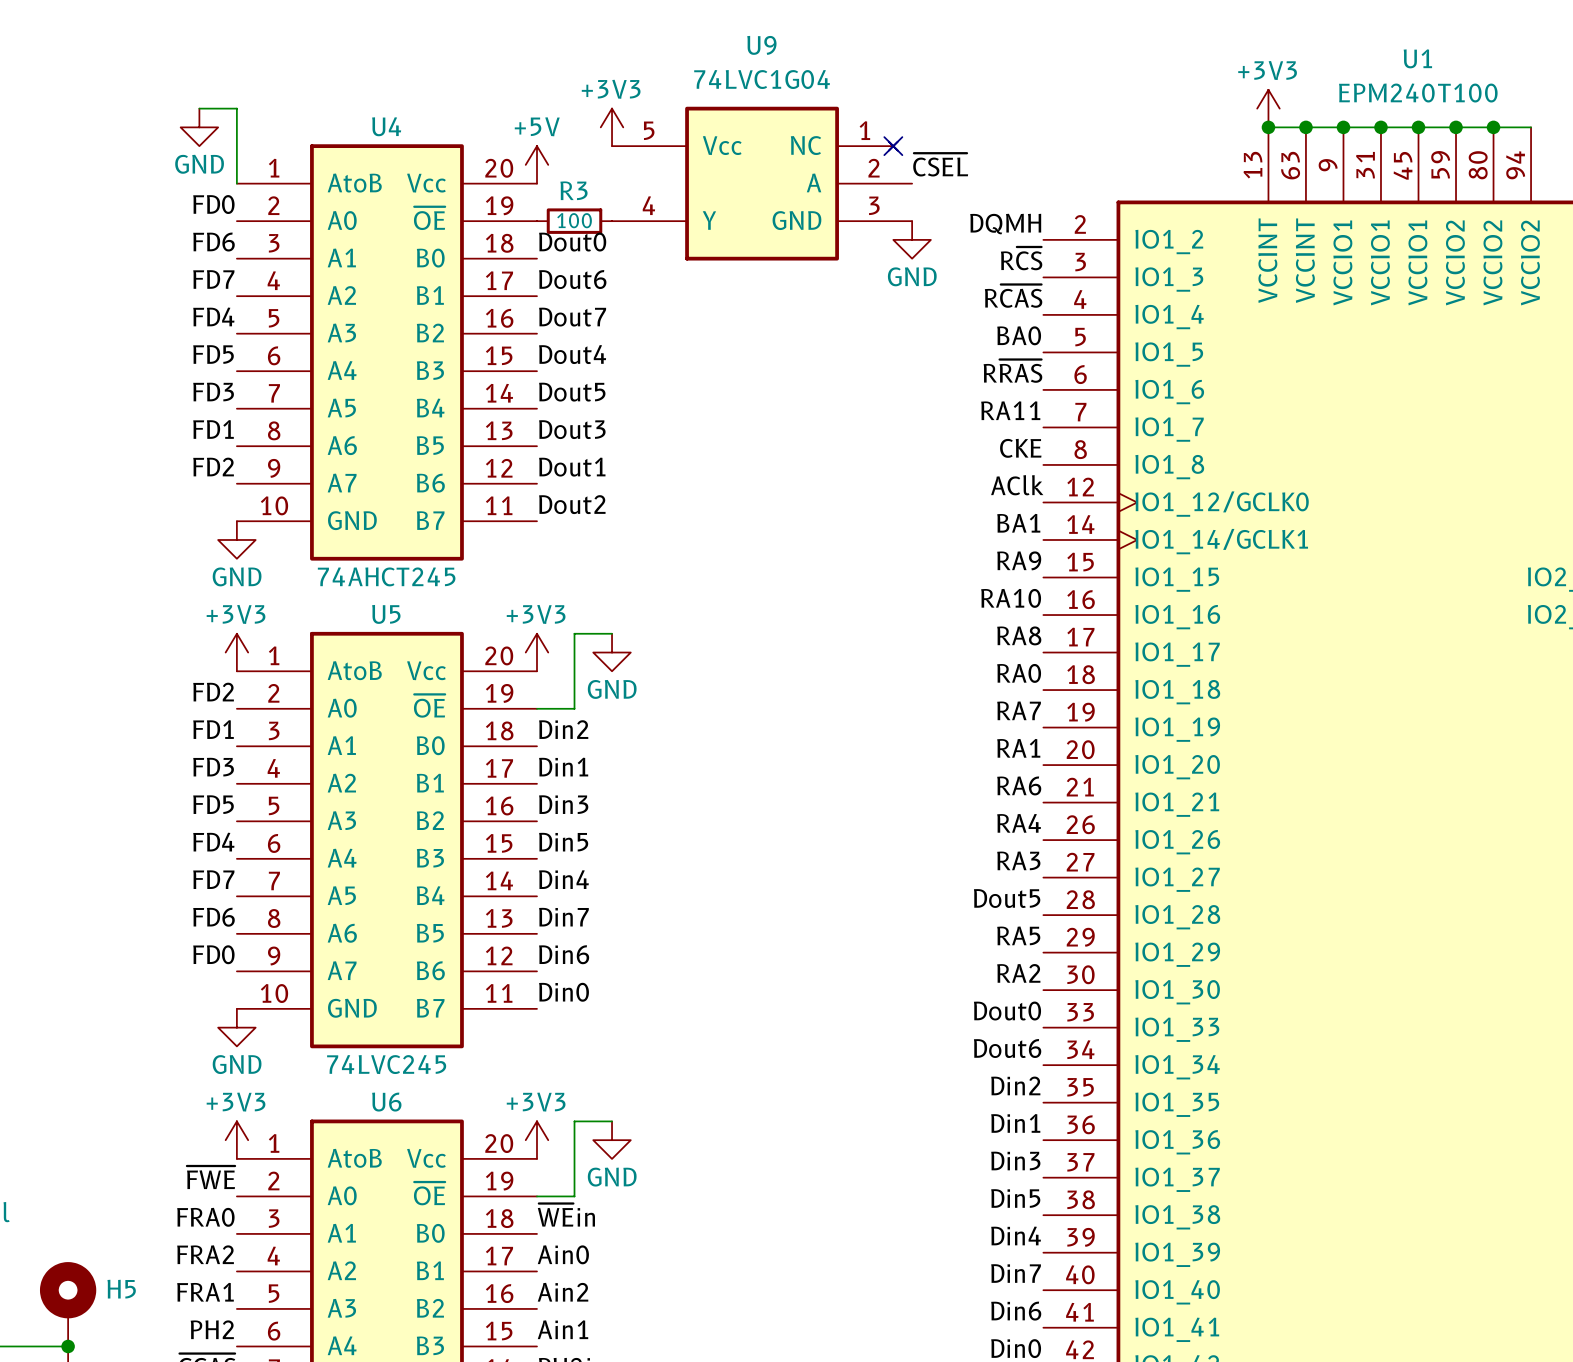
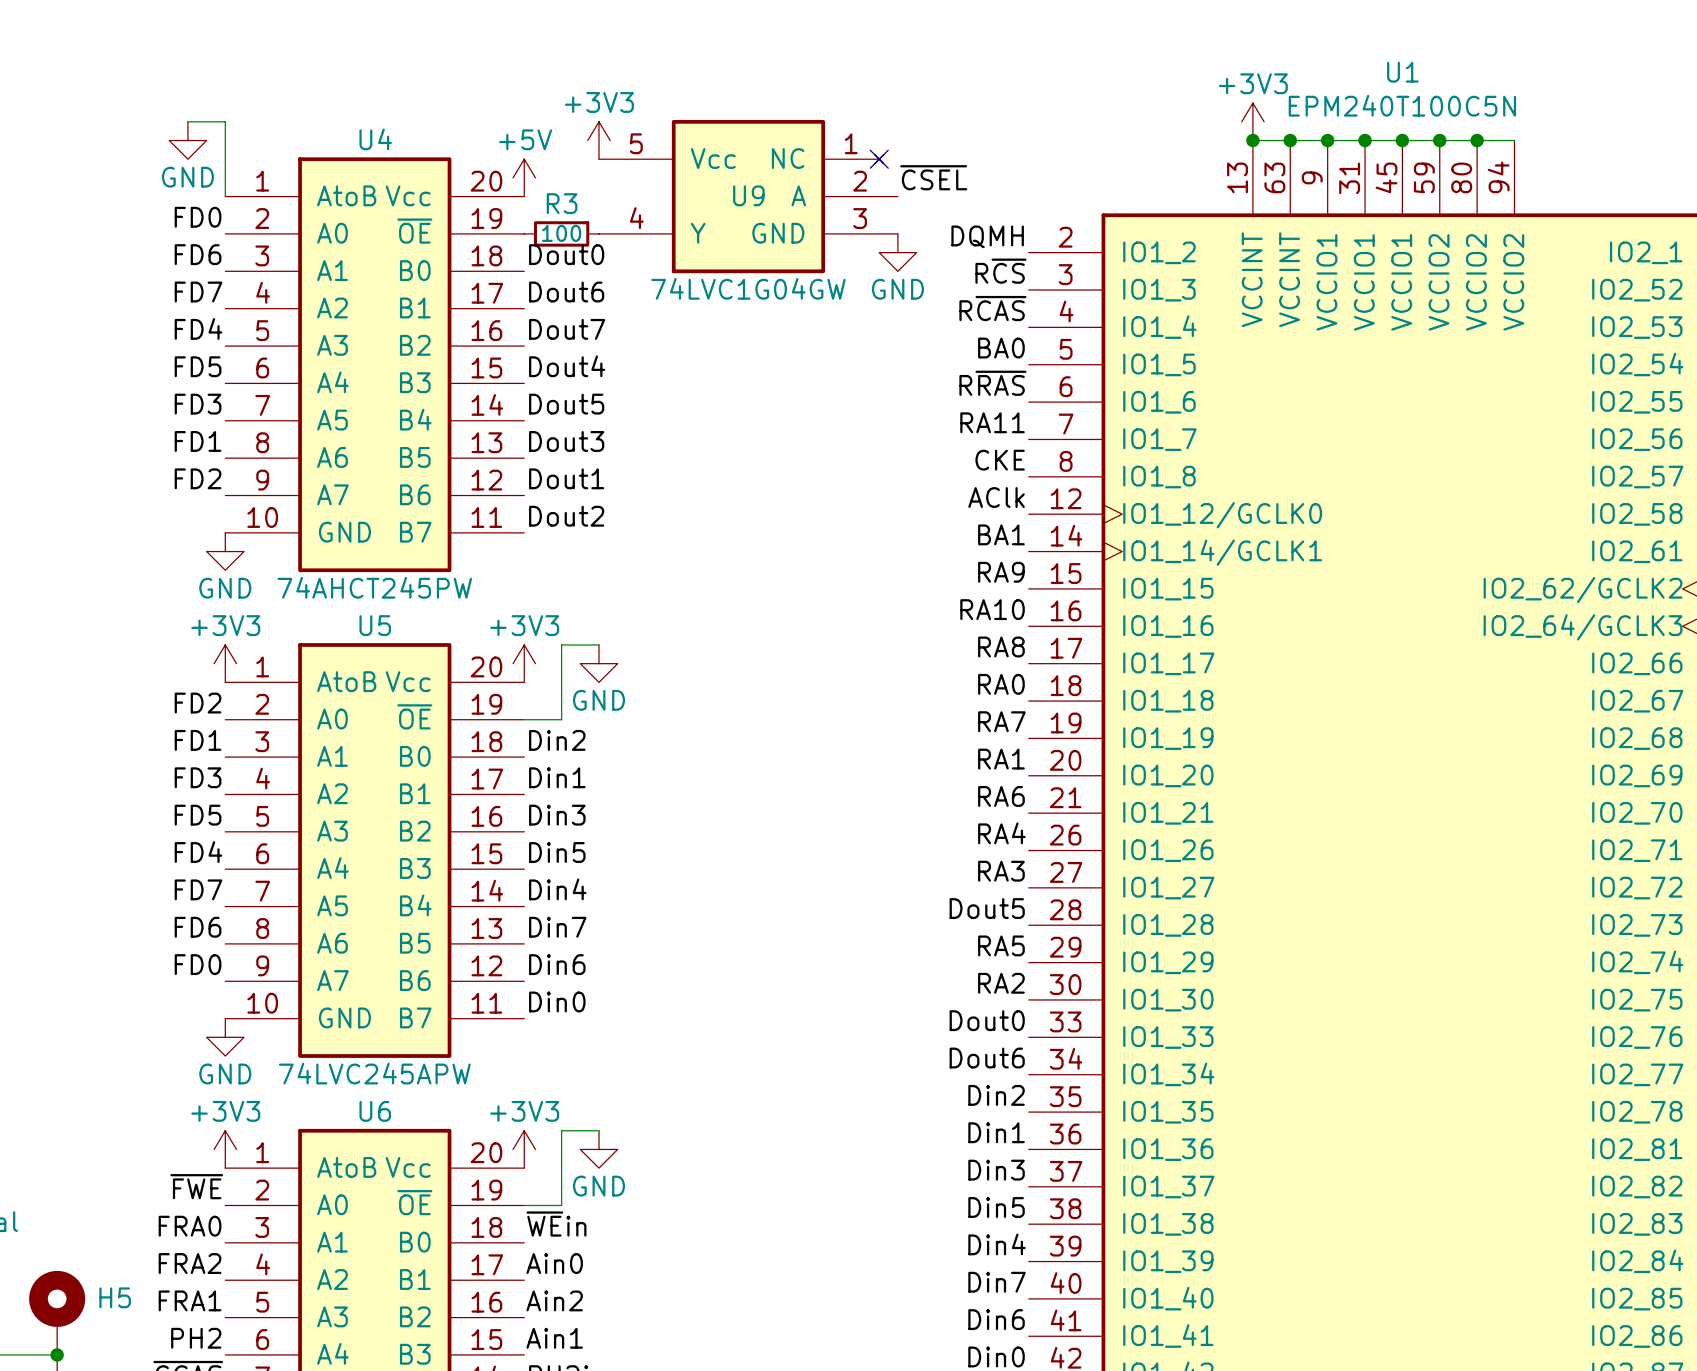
U9 name position: U9 (761, 45) -> U9 (748, 195)
U9 value: 74LVC1G04 (762, 79) -> 74LVC1G04GW (748, 288)
U1 value: EPM240T100 (1418, 93) -> EPM240T100C5N (1402, 105)
U4 value: 74AHCT245 (386, 576) -> 74AHCT245PW (374, 587)
U5 value: 74LVC245 (386, 1064) -> 74LVC245APW (374, 1073)

